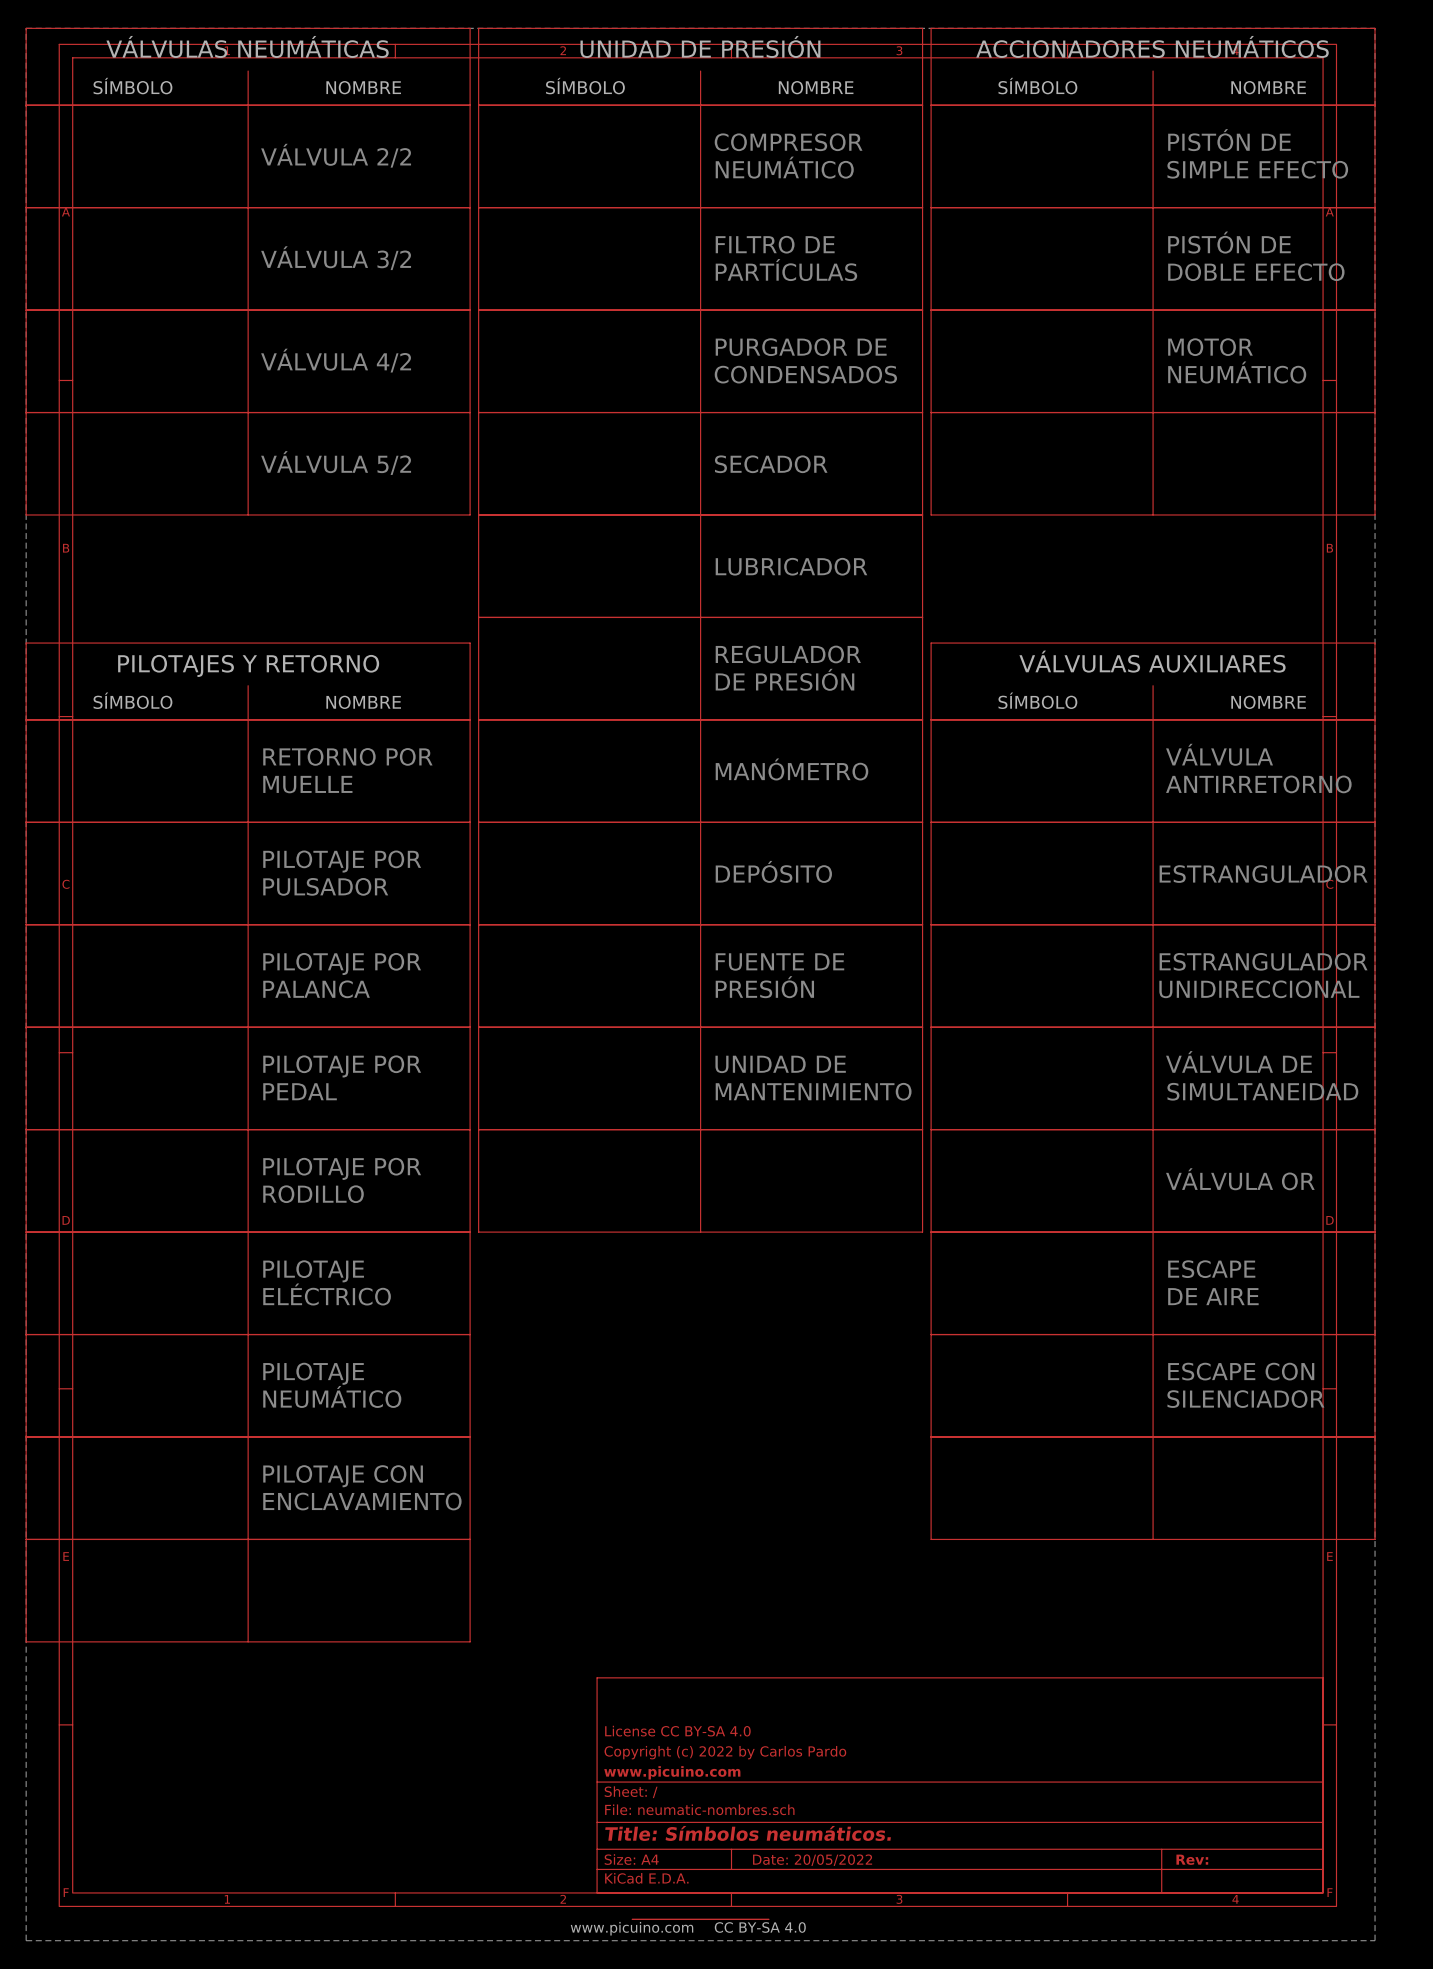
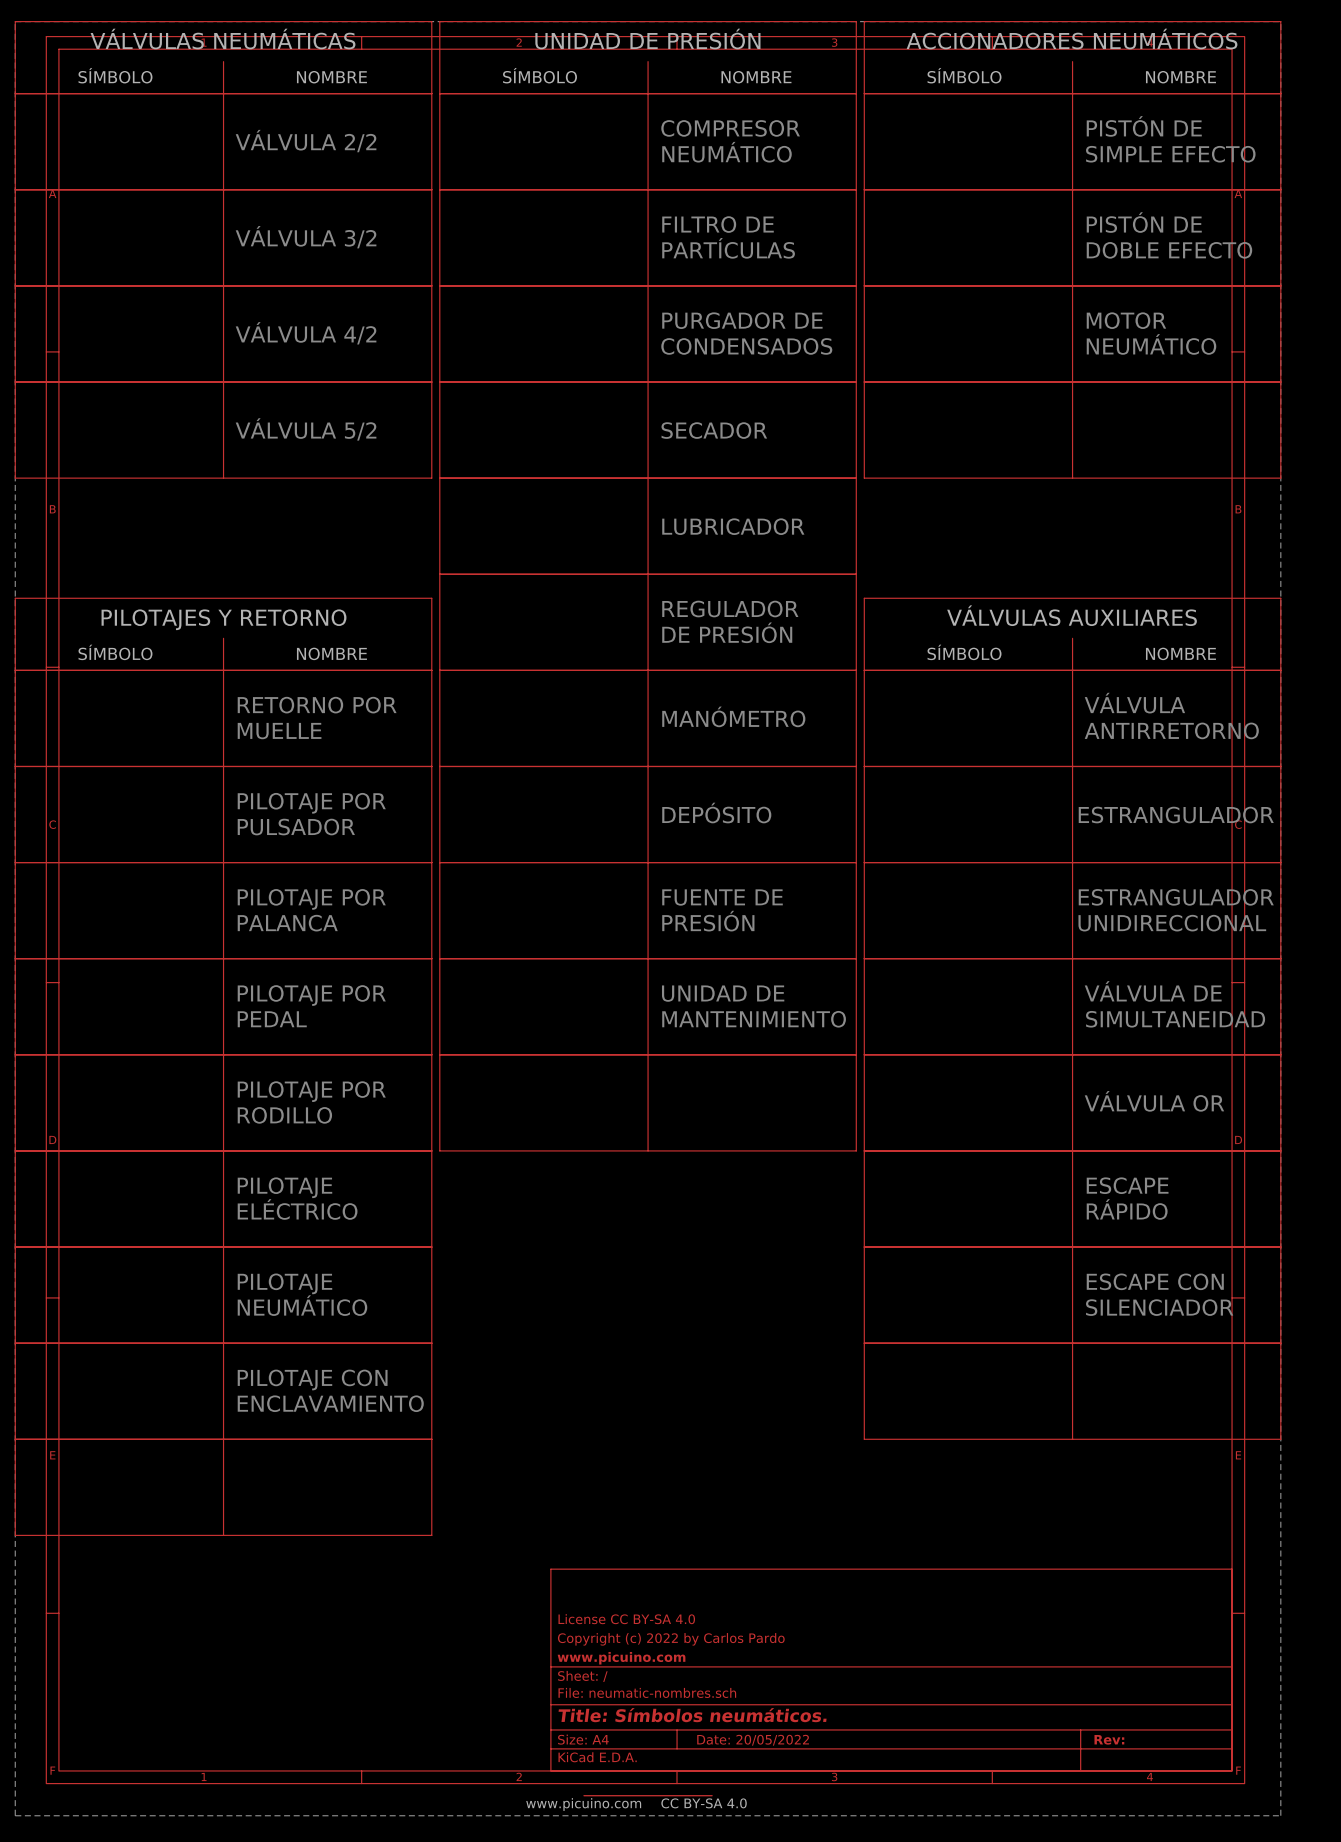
text: DE AIRE (1213, 1296) -> RÁPIDO (1127, 1209)

